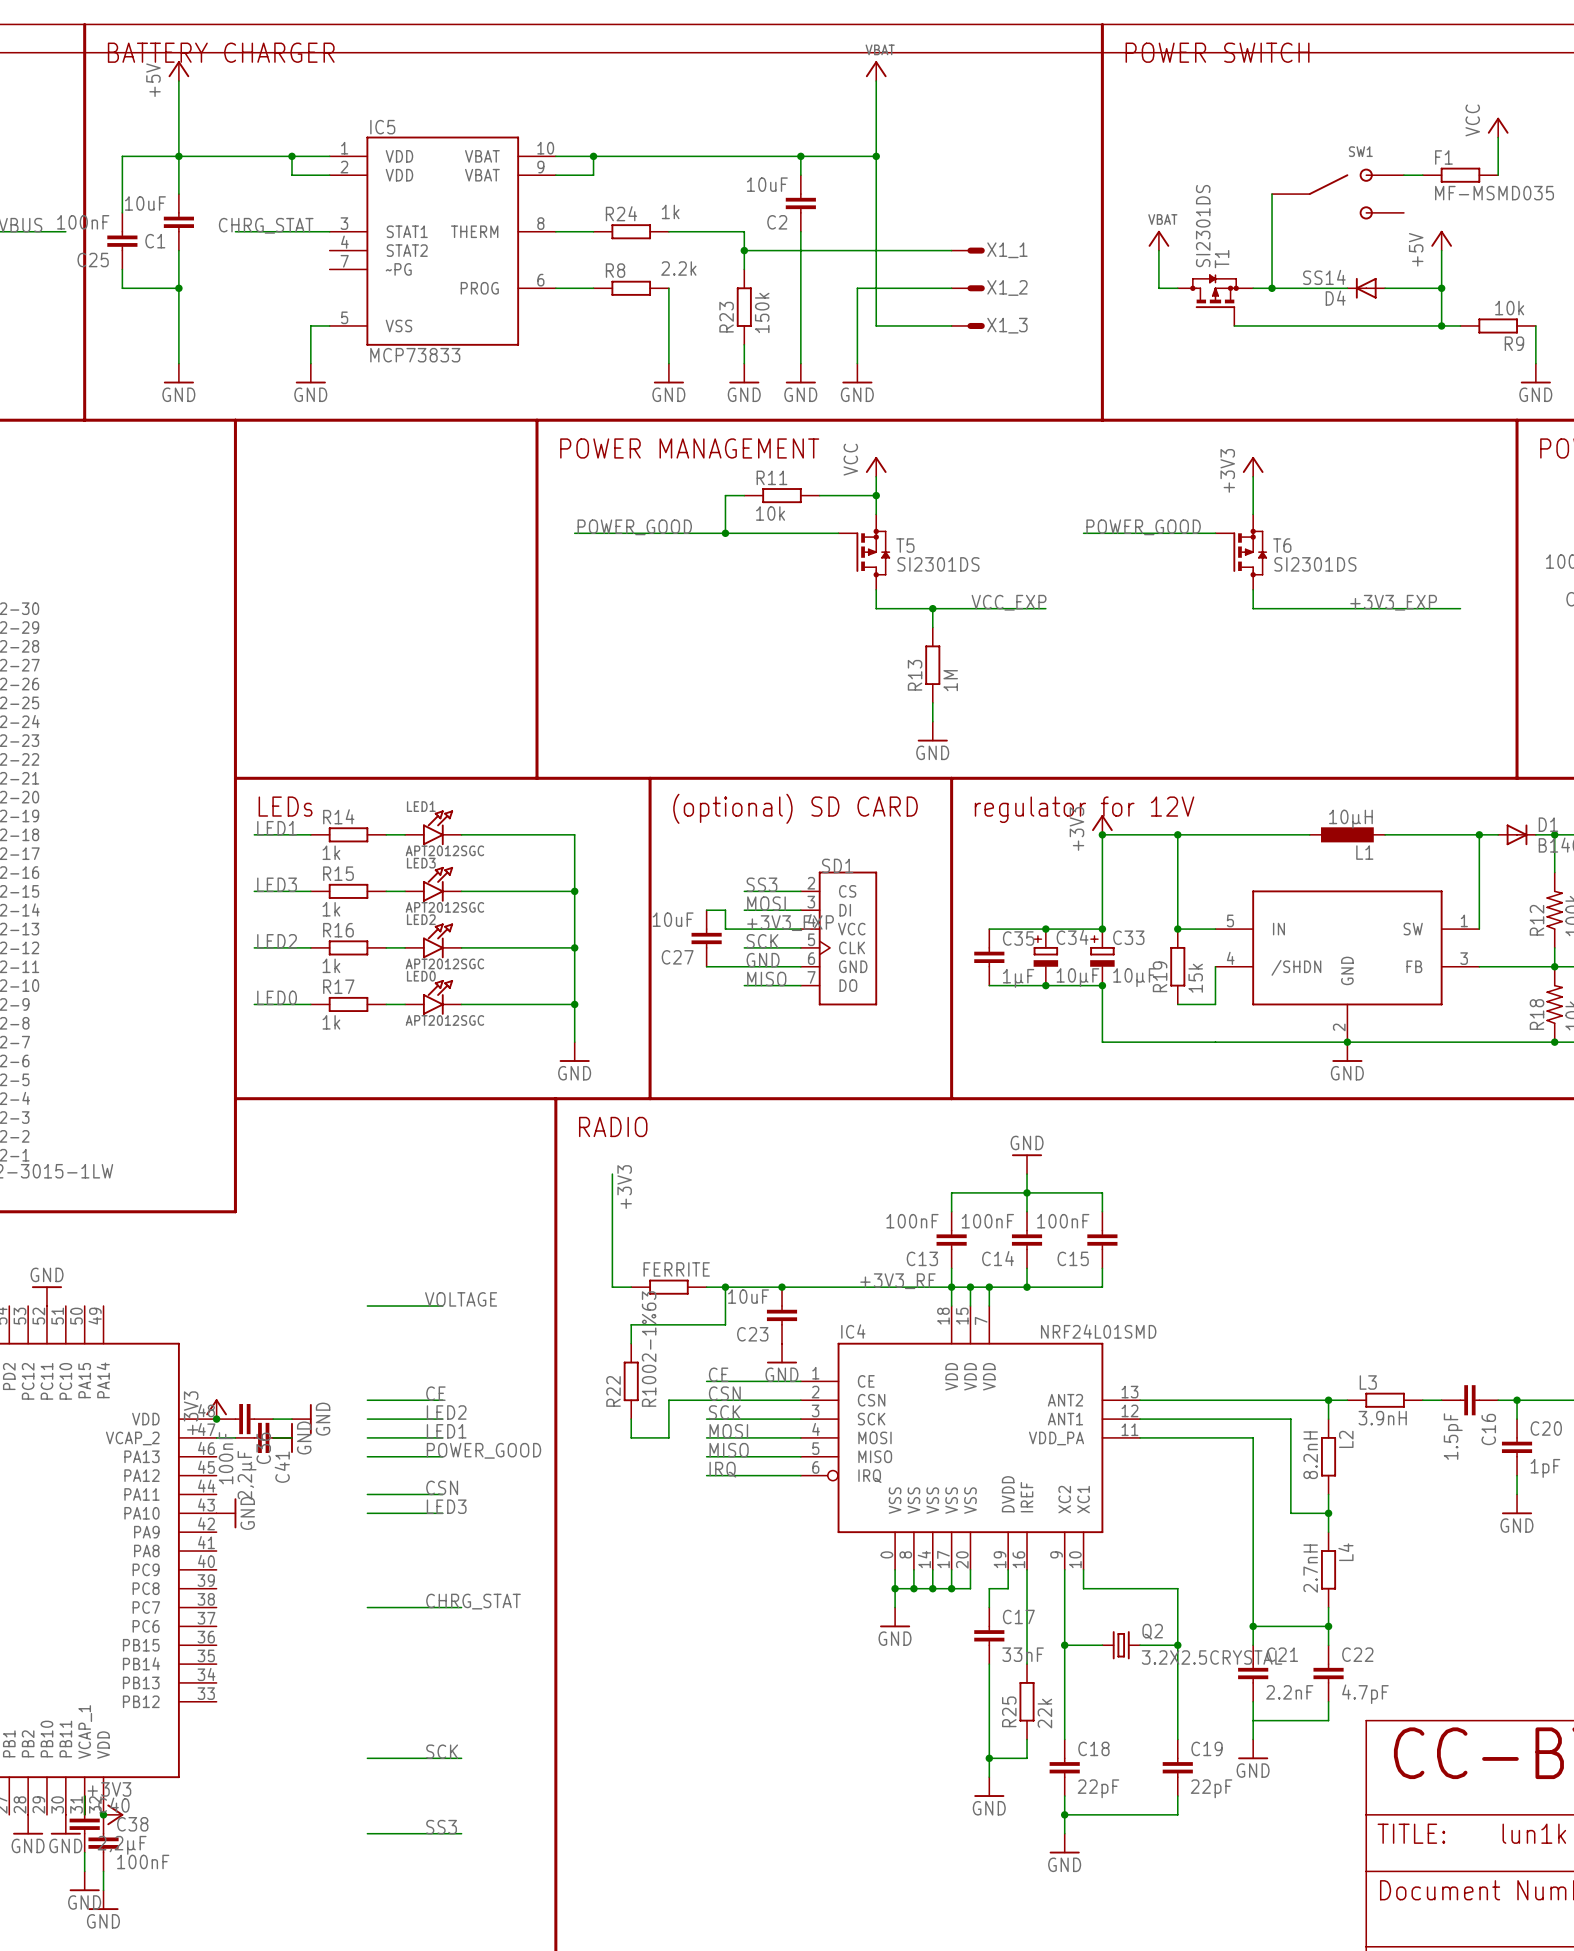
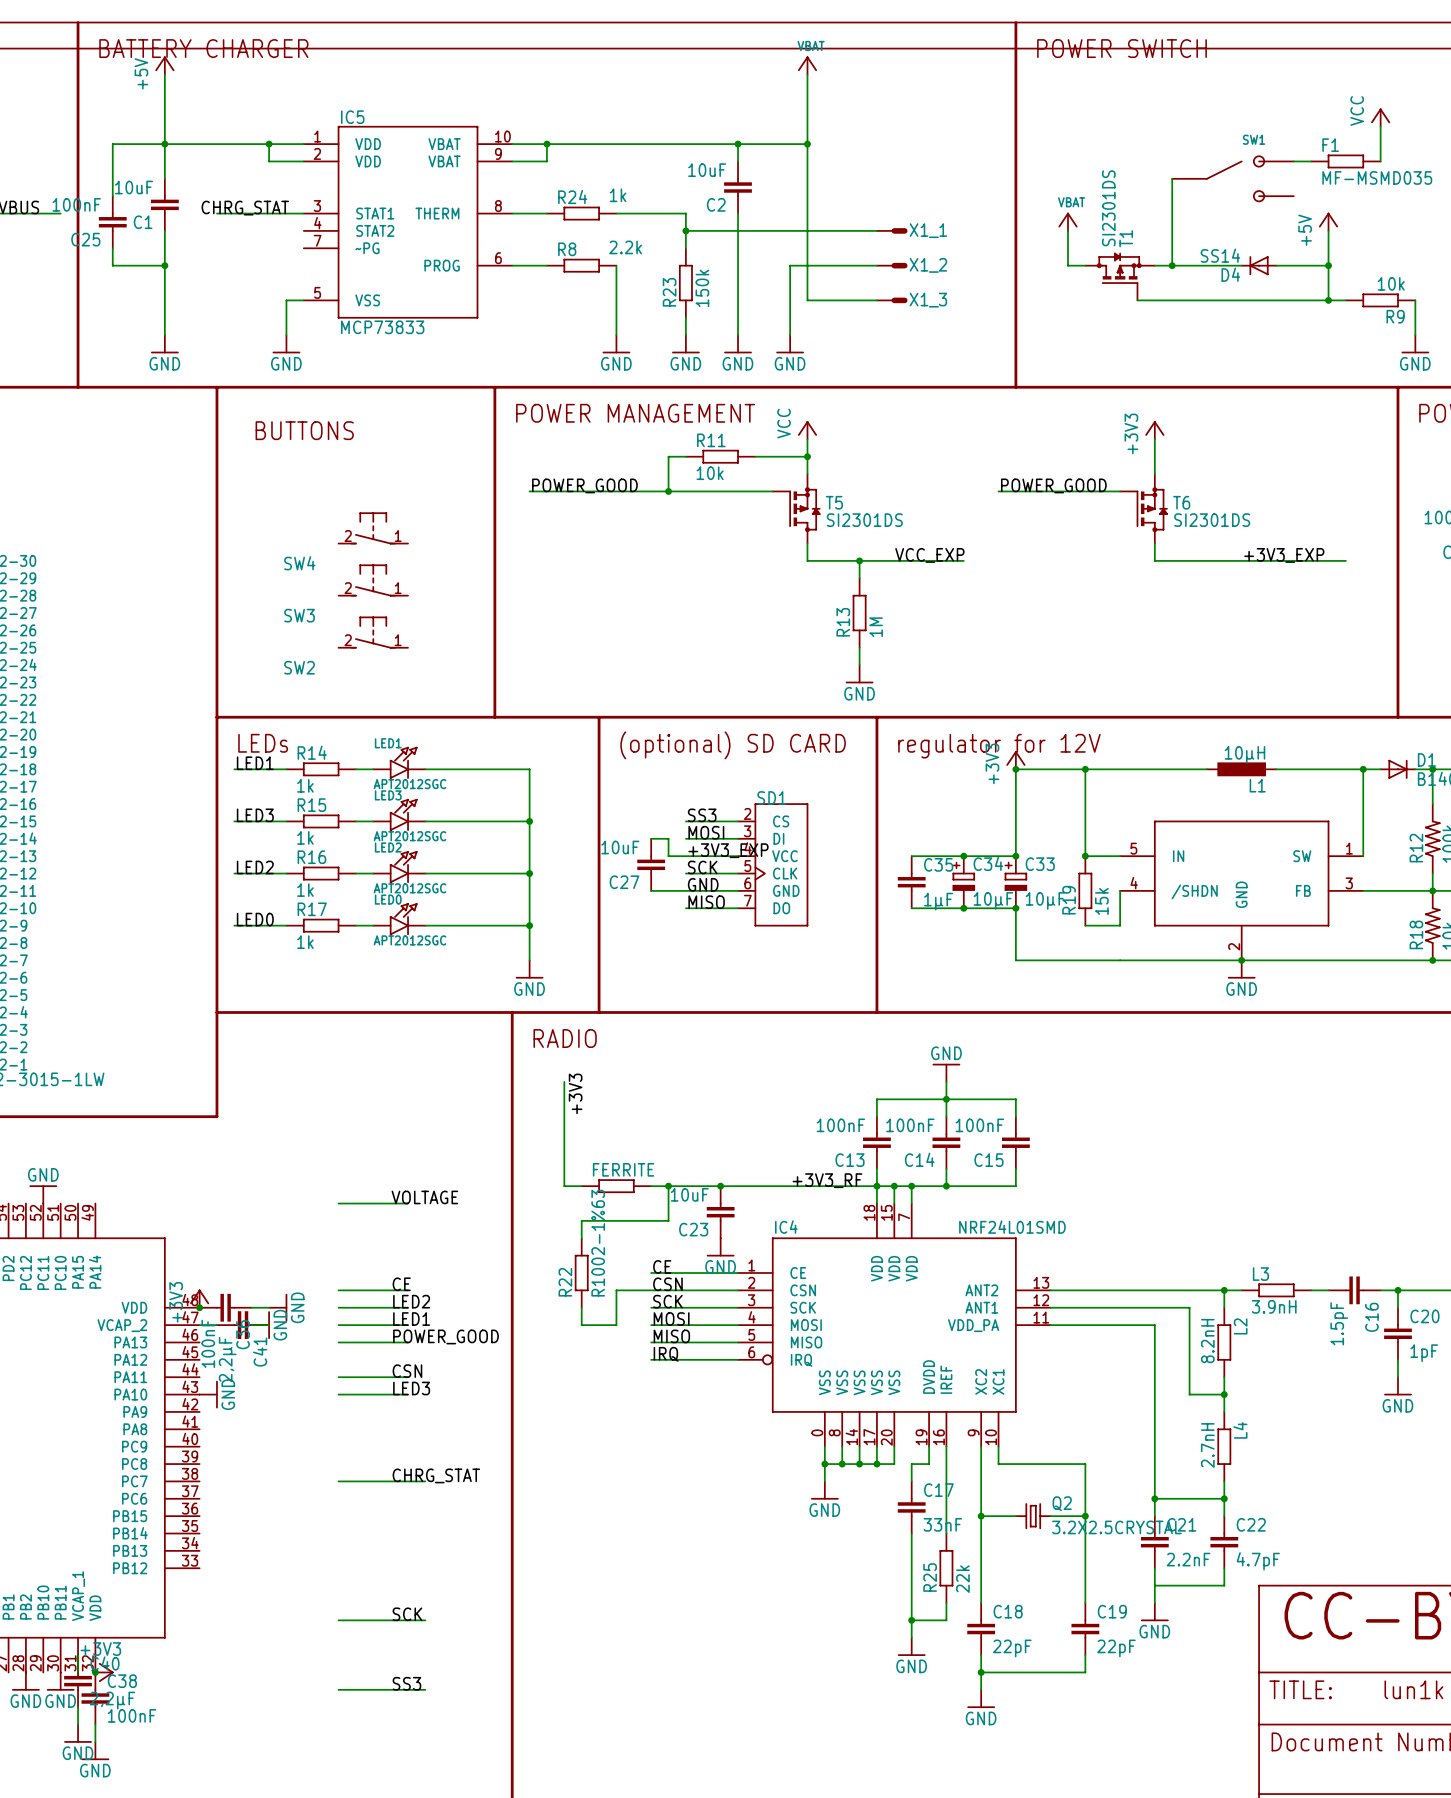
text: none -> BUTTONS (304, 430)
SW4: none -> (373, 528)
SW3: none -> (373, 580)
SW2: none -> (373, 632)

